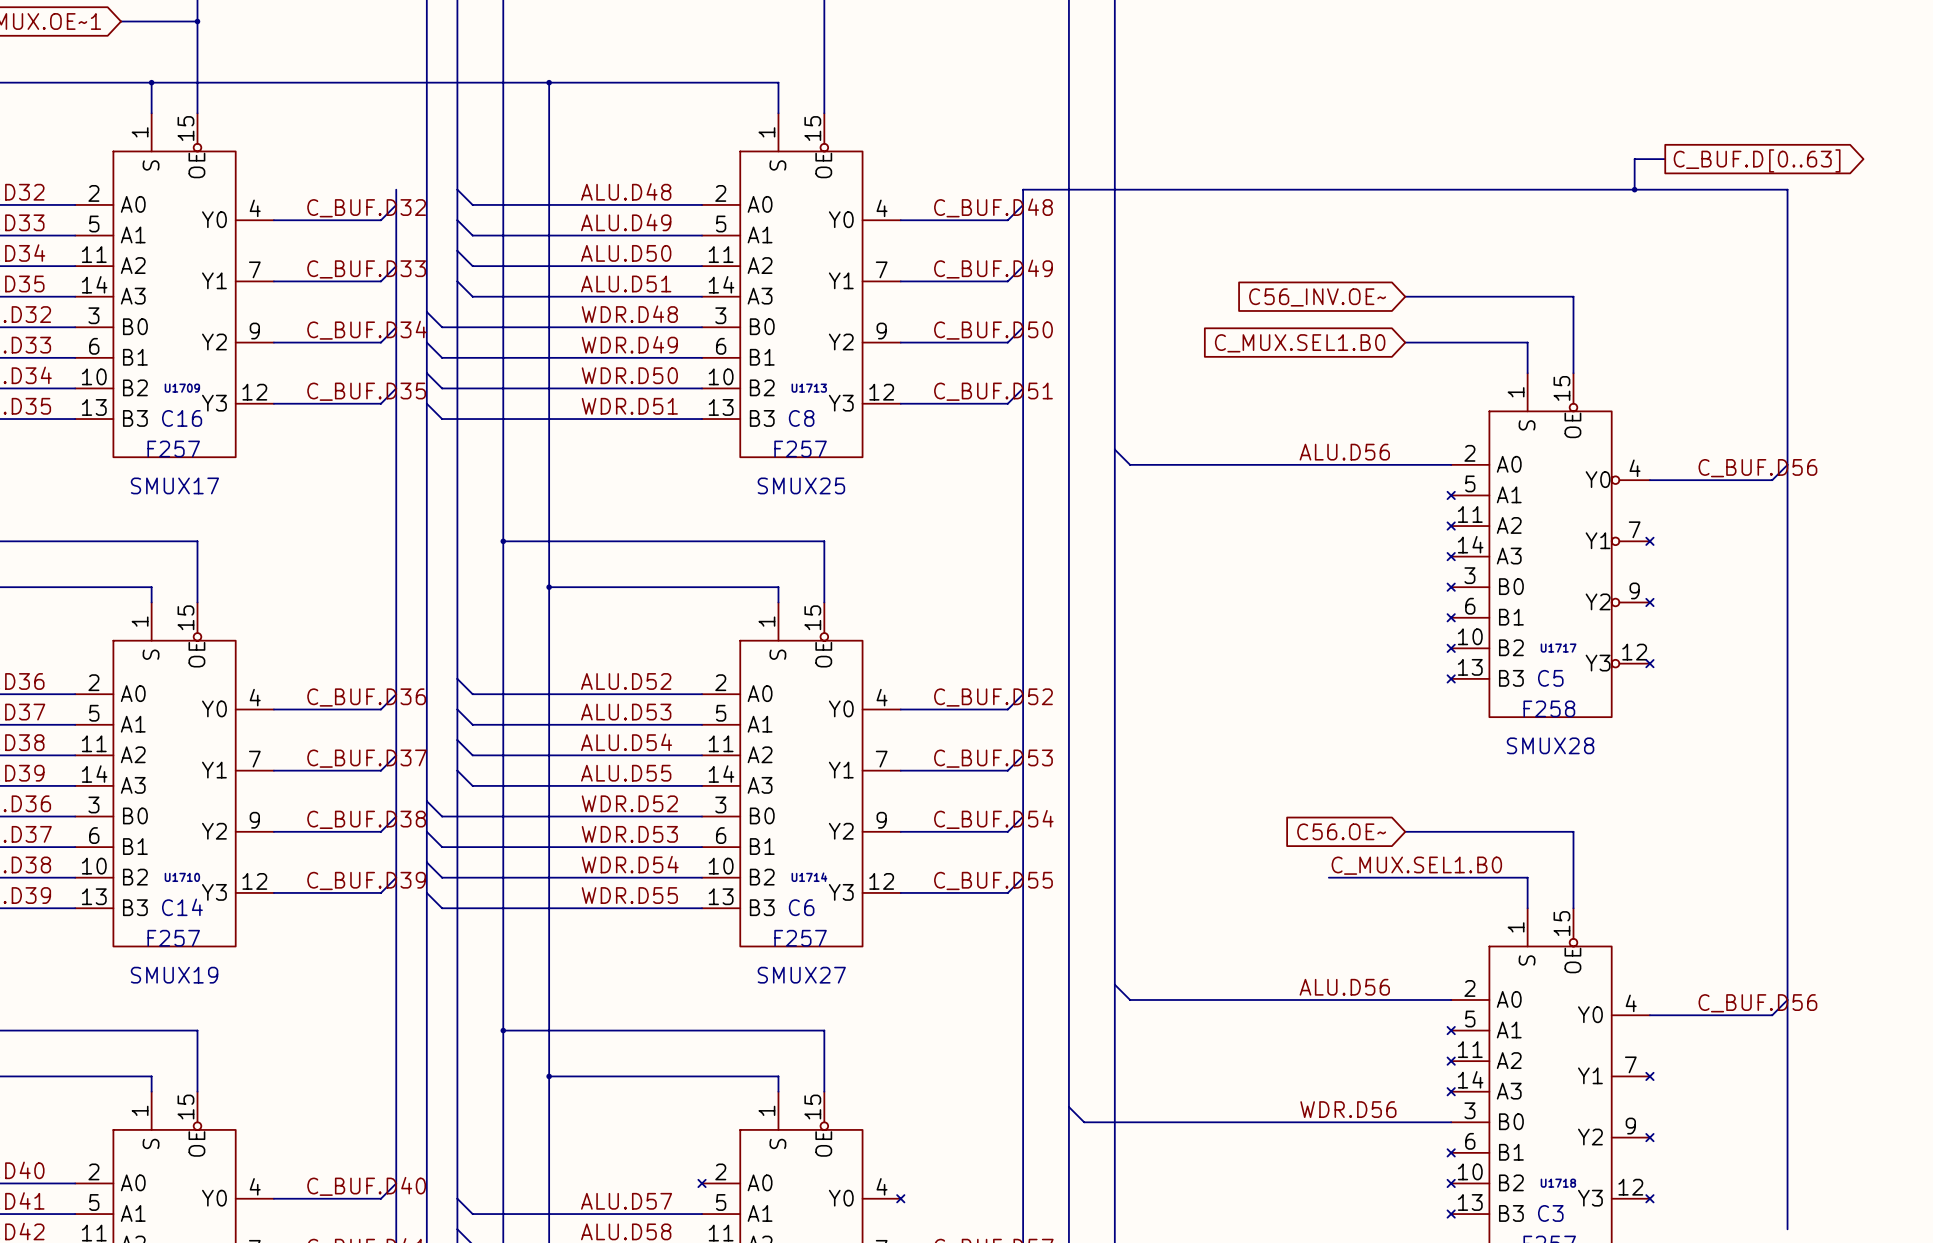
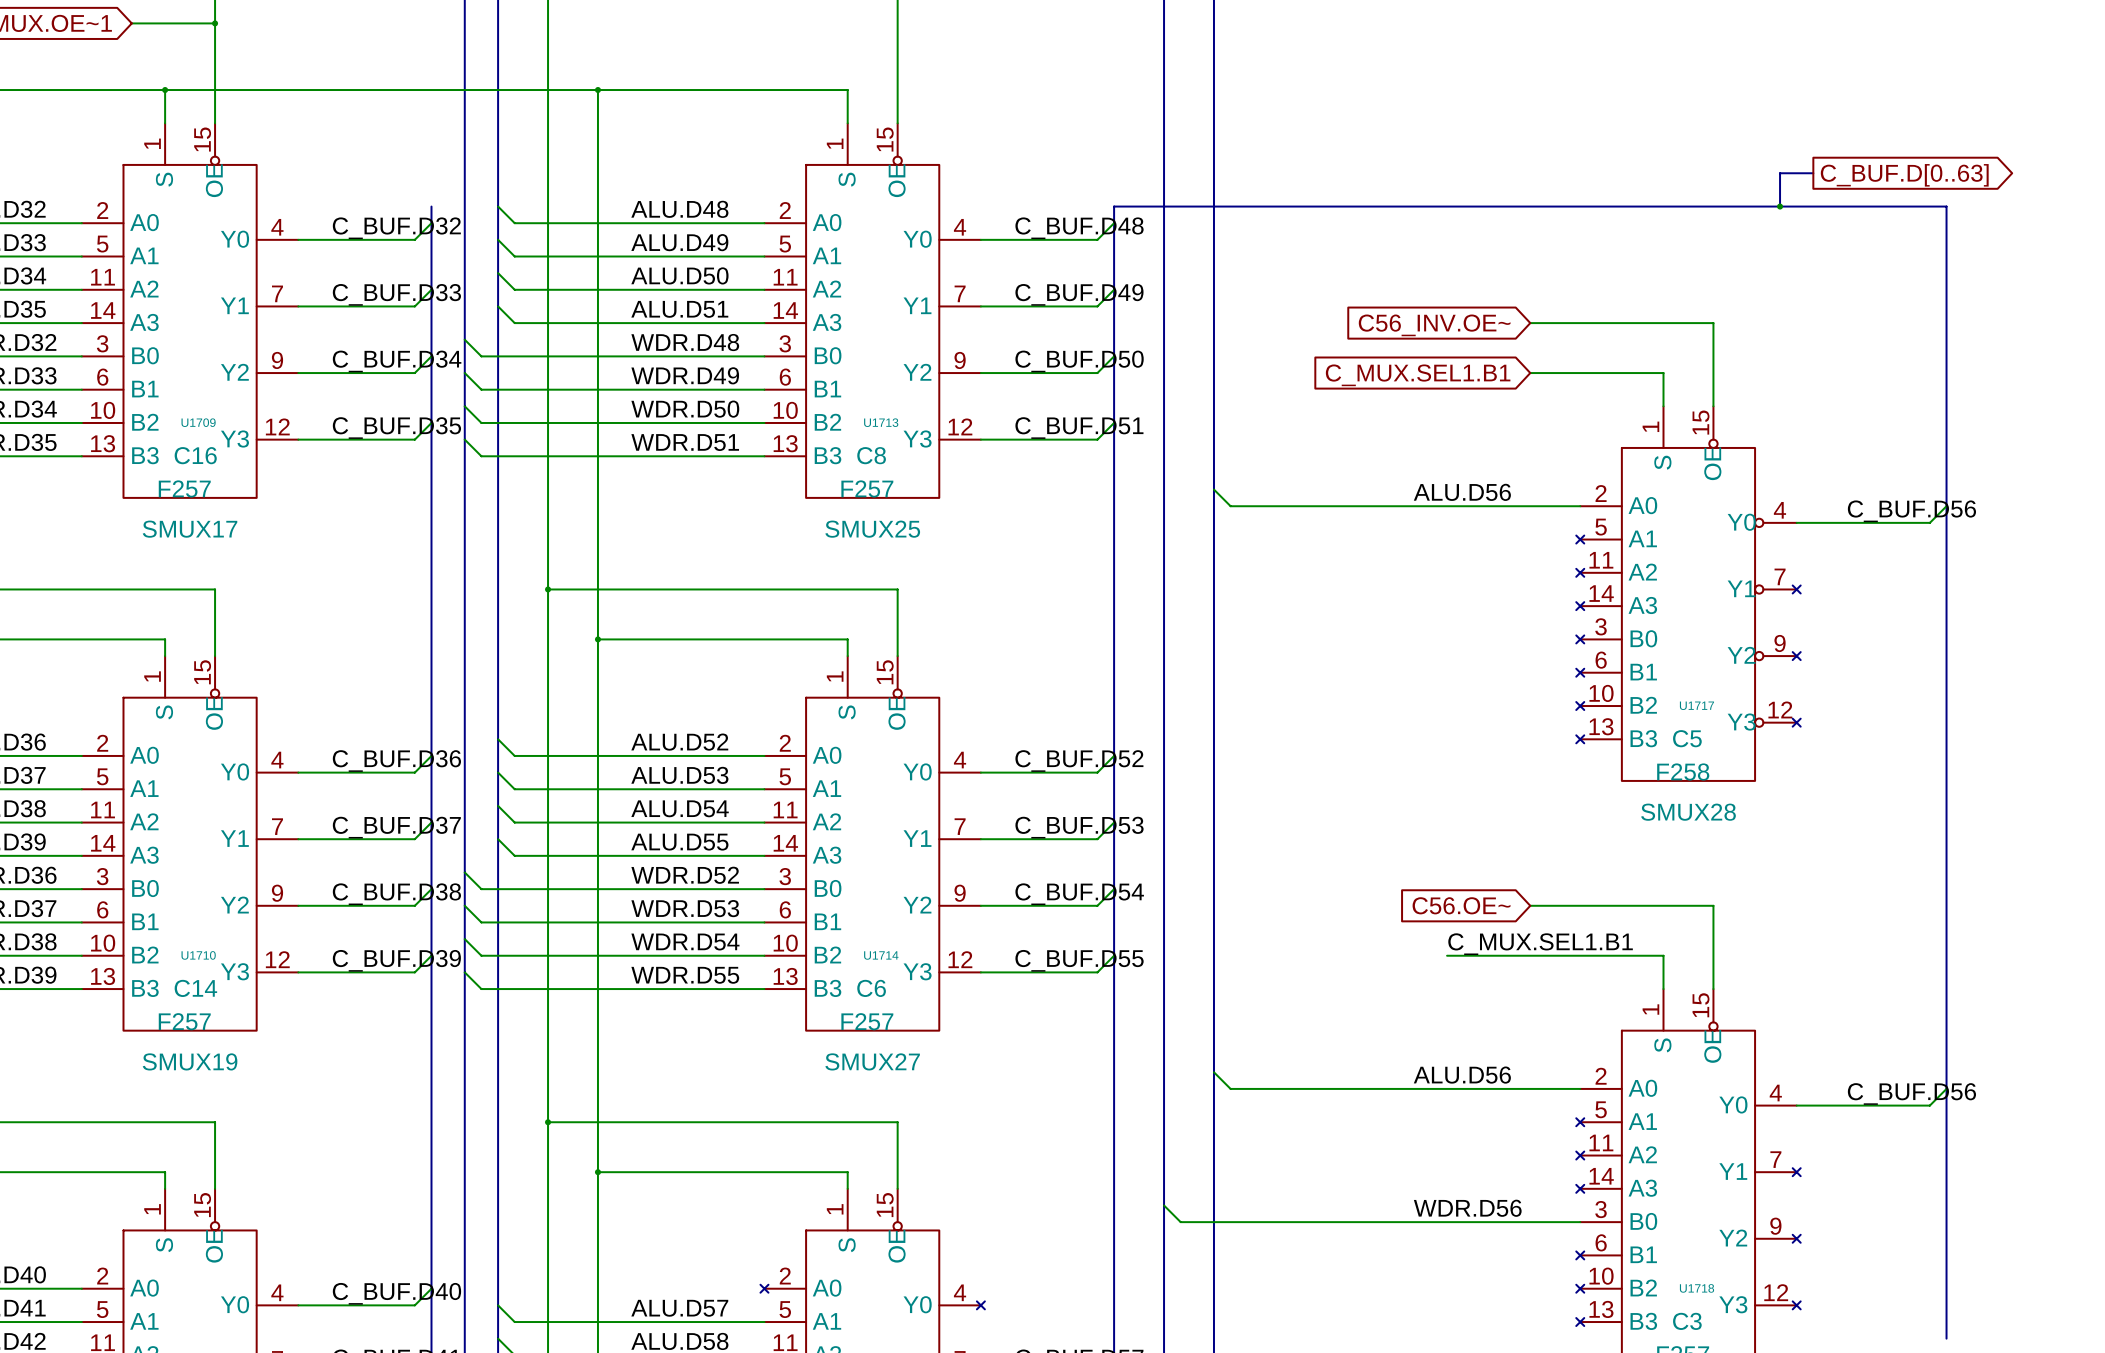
global label: C_MUX.SEL1.B0 (1300, 343) -> C_MUX.SEL1.B1 (1418, 375)
label: C_MUX.SEL1.B0 (1416, 865) -> C_MUX.SEL1.B1 (1540, 944)

